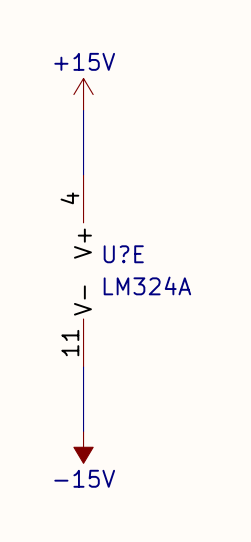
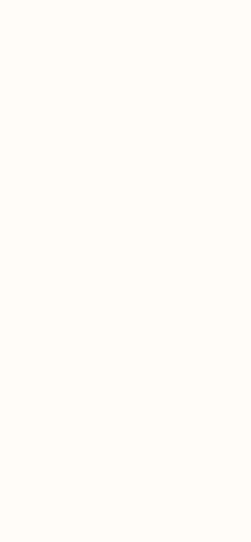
power symbol: +15V (83, 94) -> none
wire: (83, 110) (83, 174) -> none
U?E: LM324A (83, 270) -> none
wire: (83, 367) (83, 431) -> none
power symbol: -15V (83, 447) -> none

